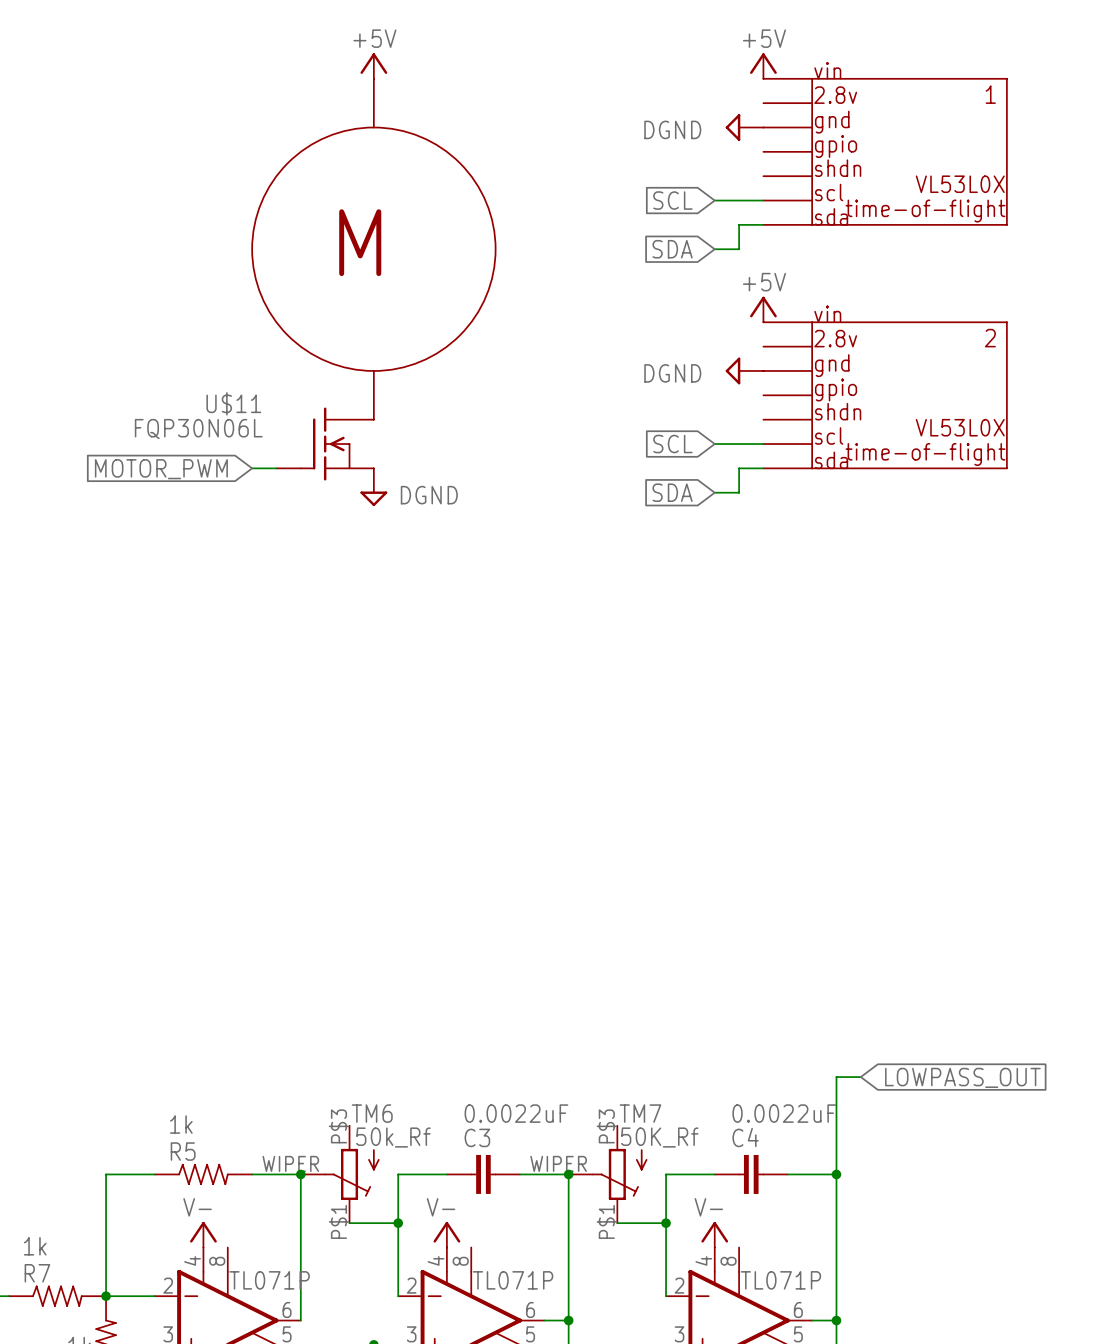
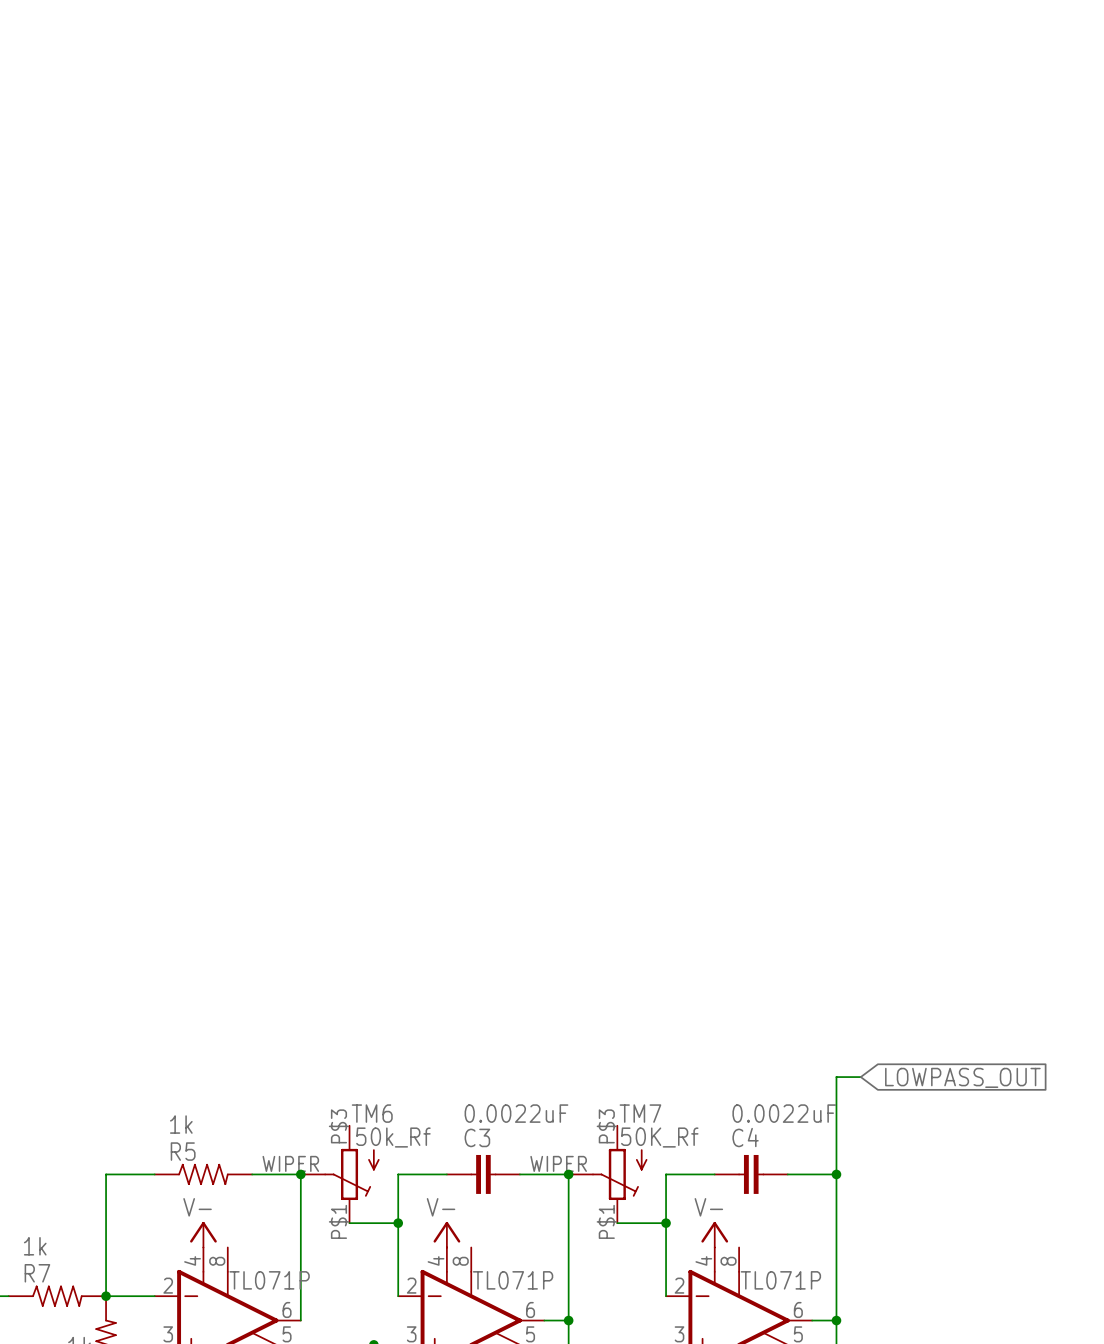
power symbol: +5V (373, 66) -> none
power symbol: +5V (763, 66) -> none
text: 1 (990, 94) -> none
power symbol: DGND (744, 127) -> none
part: (885, 151) -> none
global label: SCL (672, 200) -> none
wire: (714, 200) (763, 200) -> none
wire: (763, 224) (739, 224) (739, 249) (714, 249) -> none
part: (373, 249) -> none
global label: SDA (672, 249) -> none
power symbol: +5V (763, 309) -> none
text: 2 (990, 338) -> none
power symbol: DGND (744, 370) -> none
part: (885, 395) -> none
U$11: FQP30N06L (325, 444) -> none
global label: SCL (672, 444) -> none
wire: (714, 444) (763, 444) -> none
wire: (252, 468) (276, 468) -> none
wire: (763, 468) (739, 468) (739, 492) (714, 492) -> none
global label: MOTOR_PWM (161, 469) -> none
power symbol: DGND (373, 487) -> none
global label: SDA (672, 492) -> none

